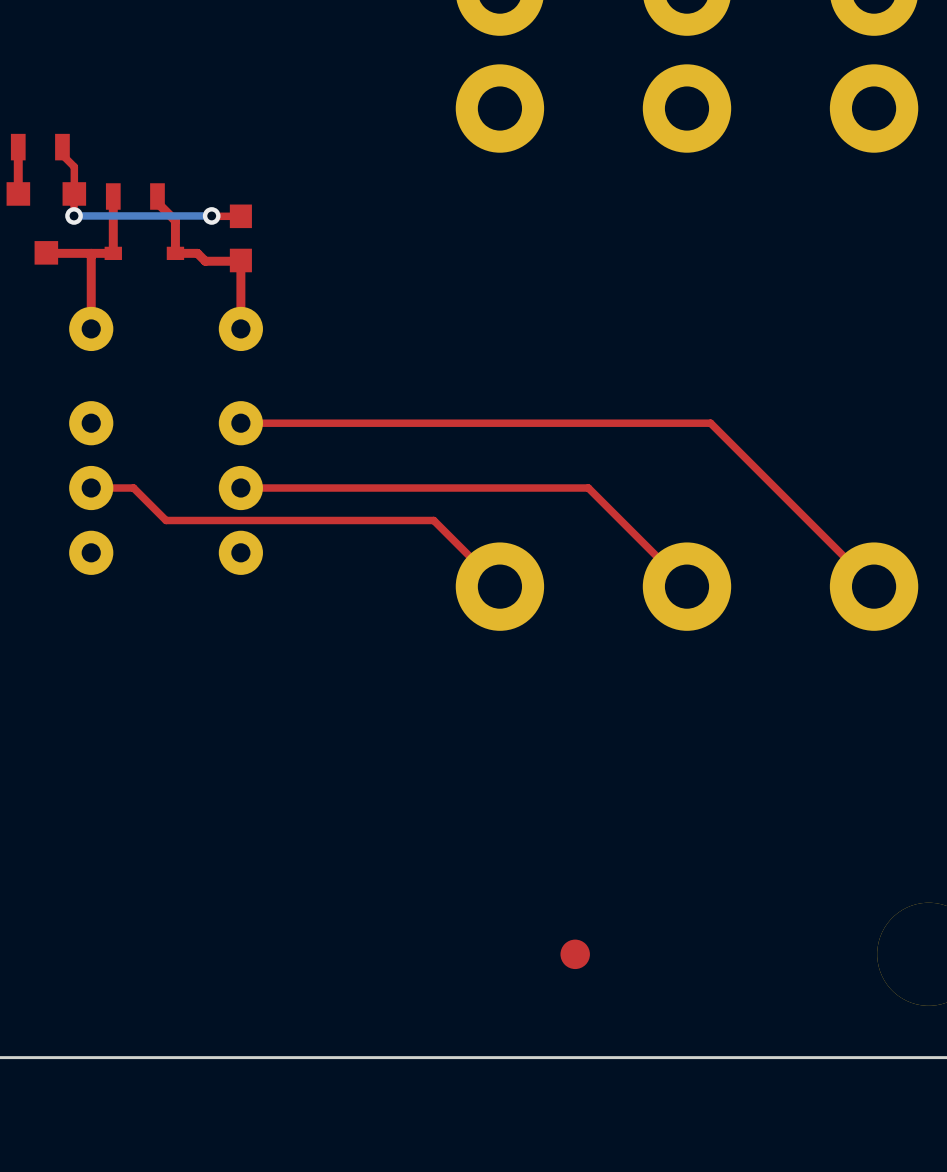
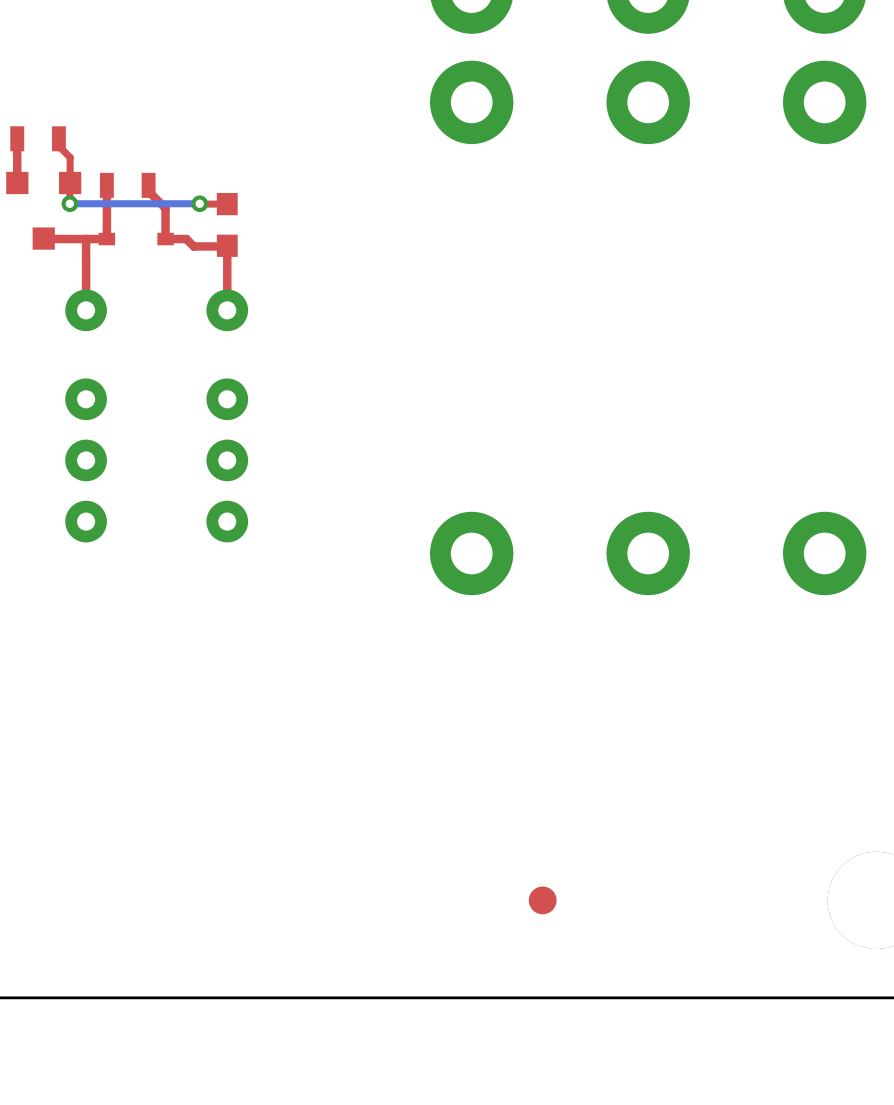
top track: (240, 423) (710, 423) (874, 586) -> none
top track: (91, 488) (133, 488) (166, 520) (433, 520) (499, 586) -> none
top track: (240, 488) (588, 488) (687, 586) -> none

